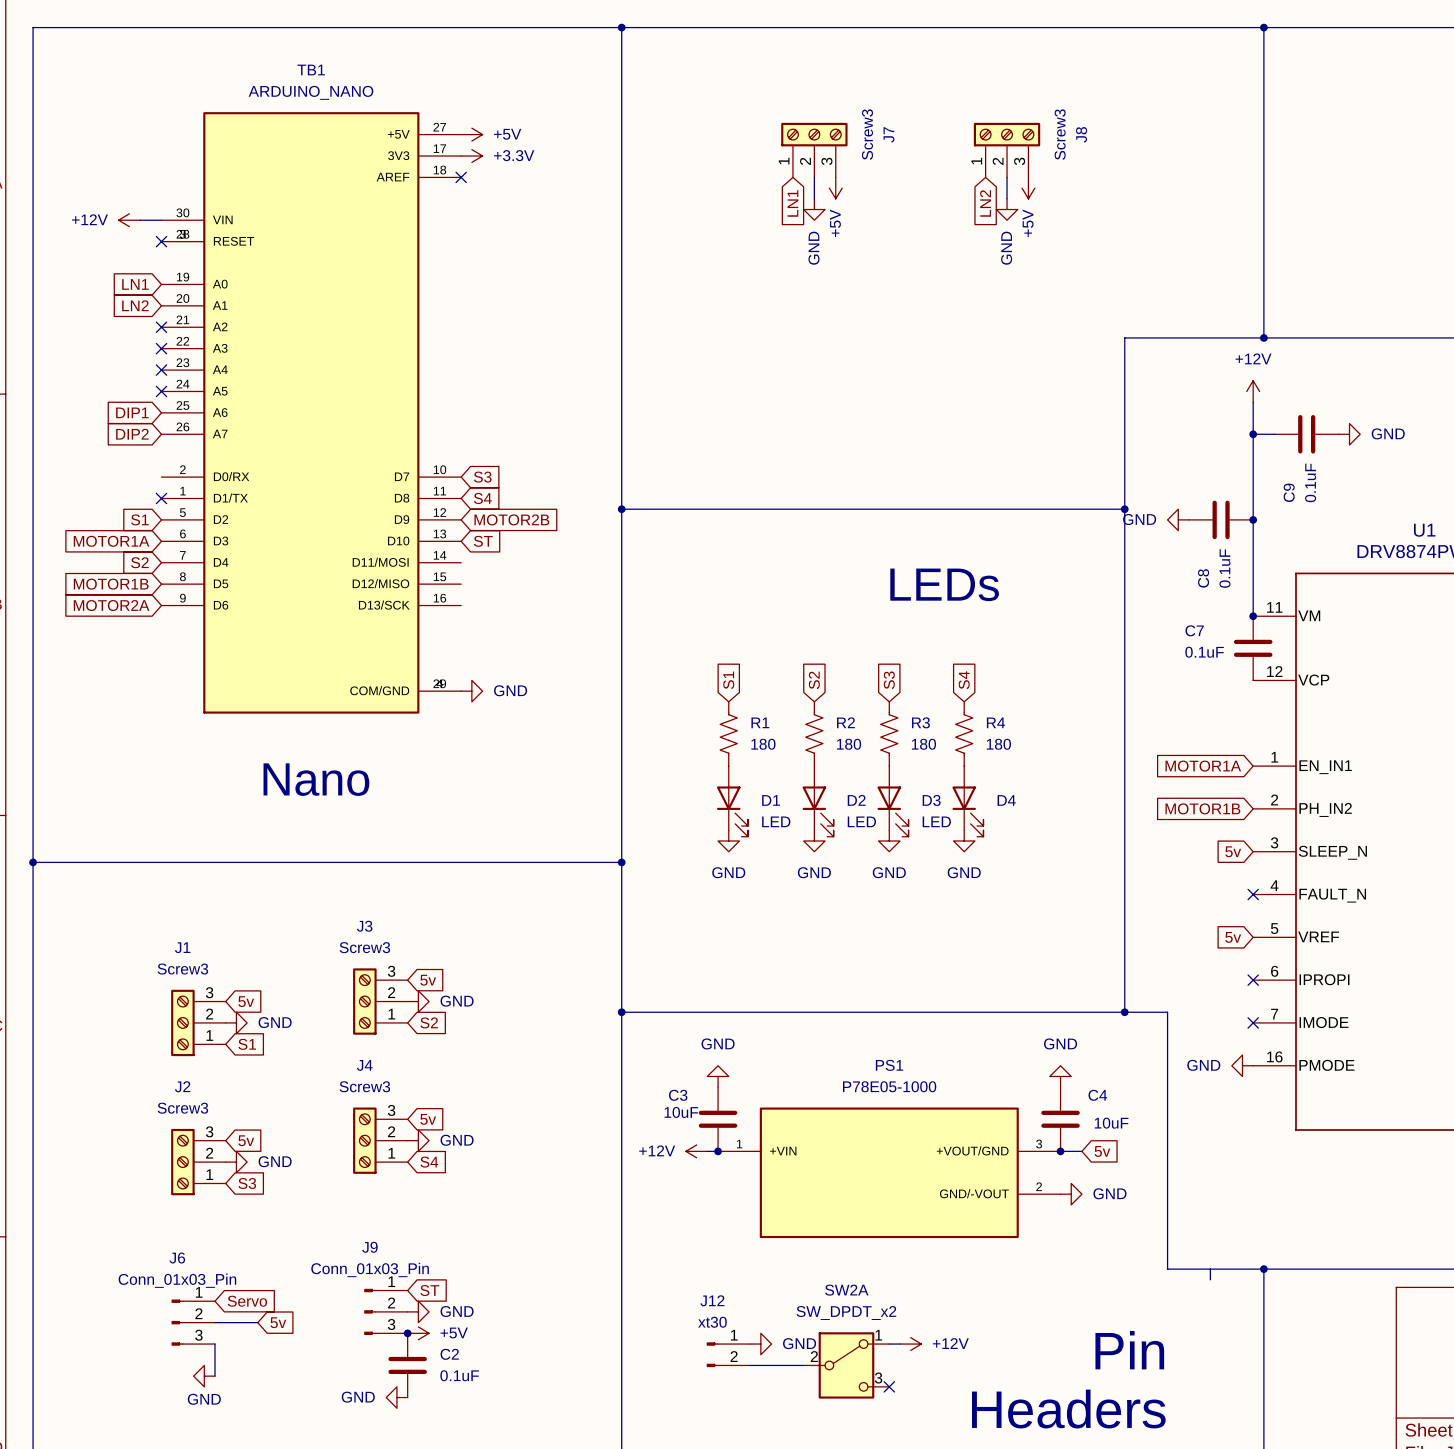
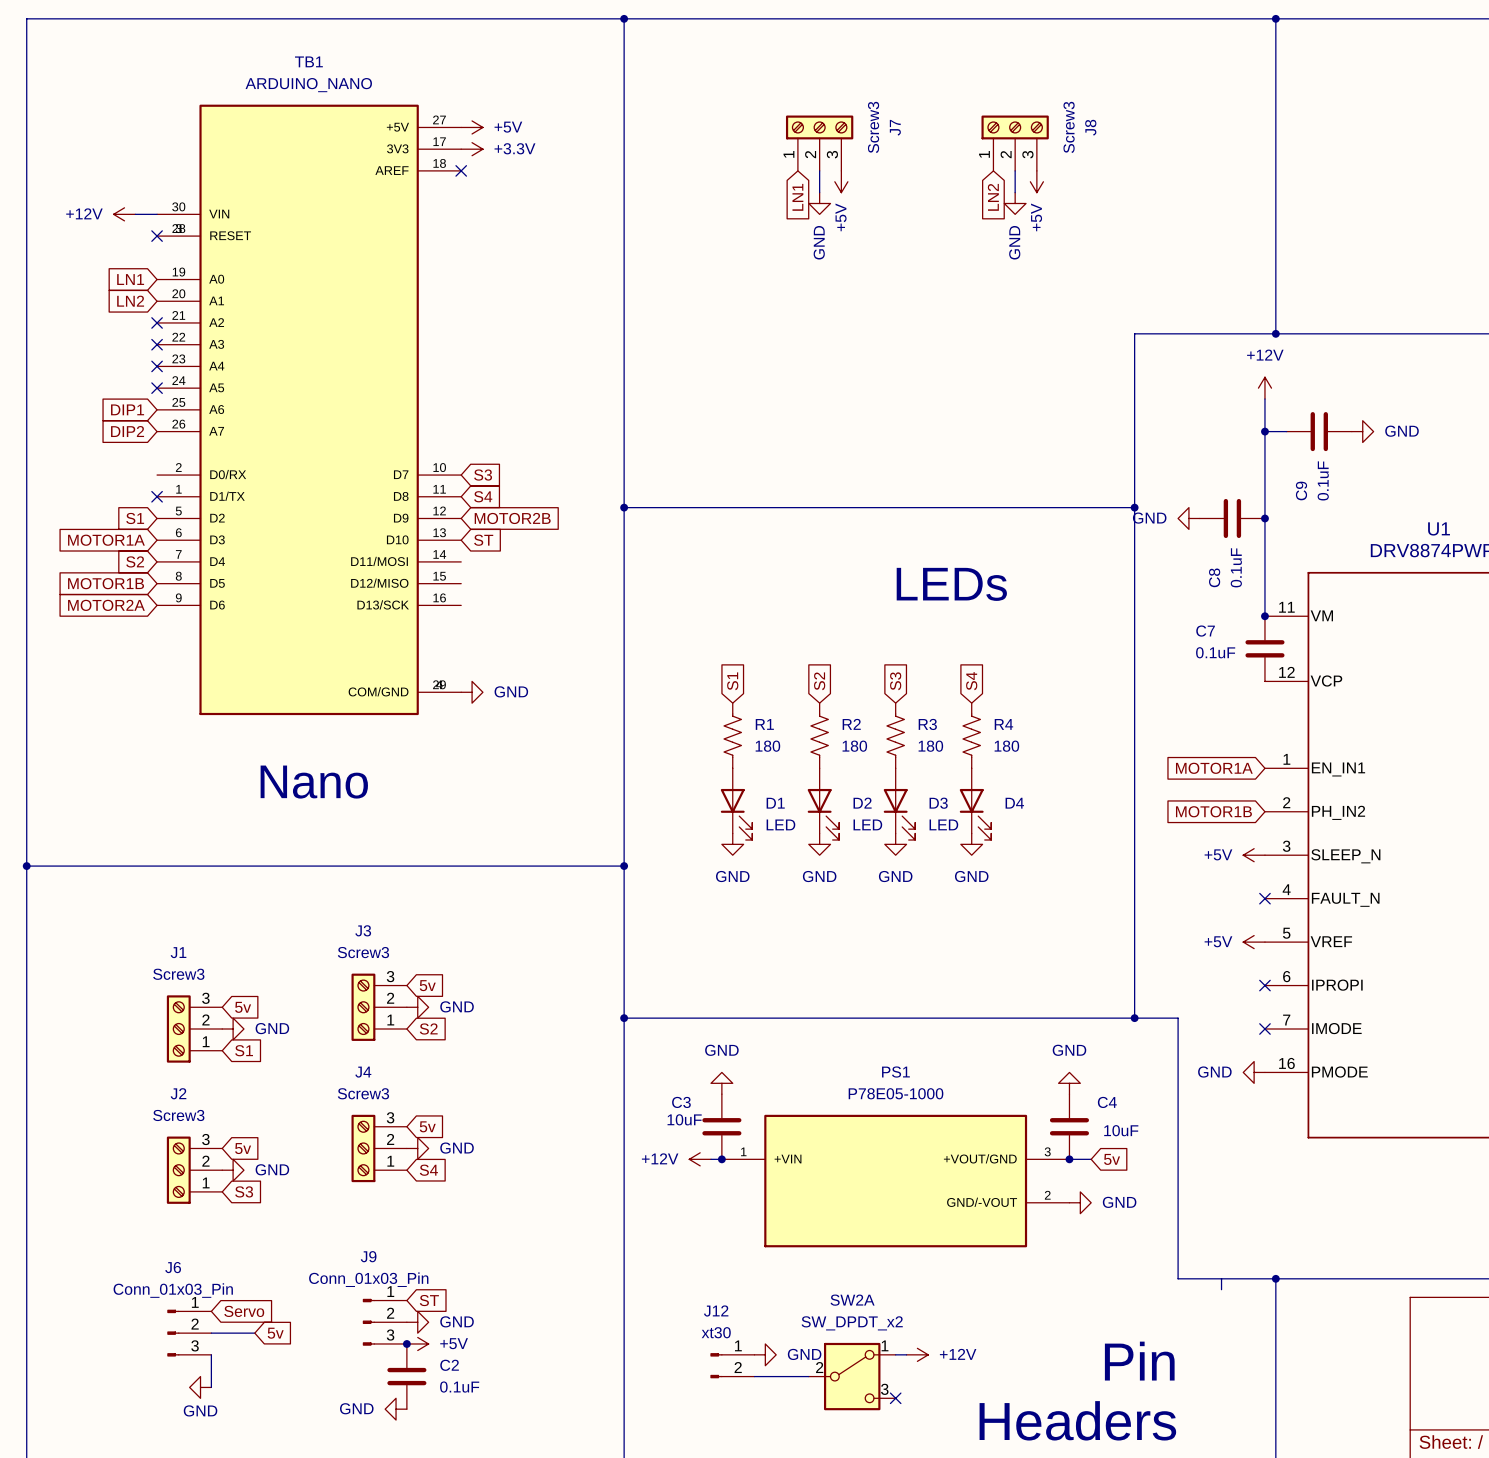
global label: 5v (1233, 851) -> none
power symbol: none -> +5V (1254, 855)
global label: 5v (1233, 937) -> none
power symbol: none -> +5V (1254, 942)

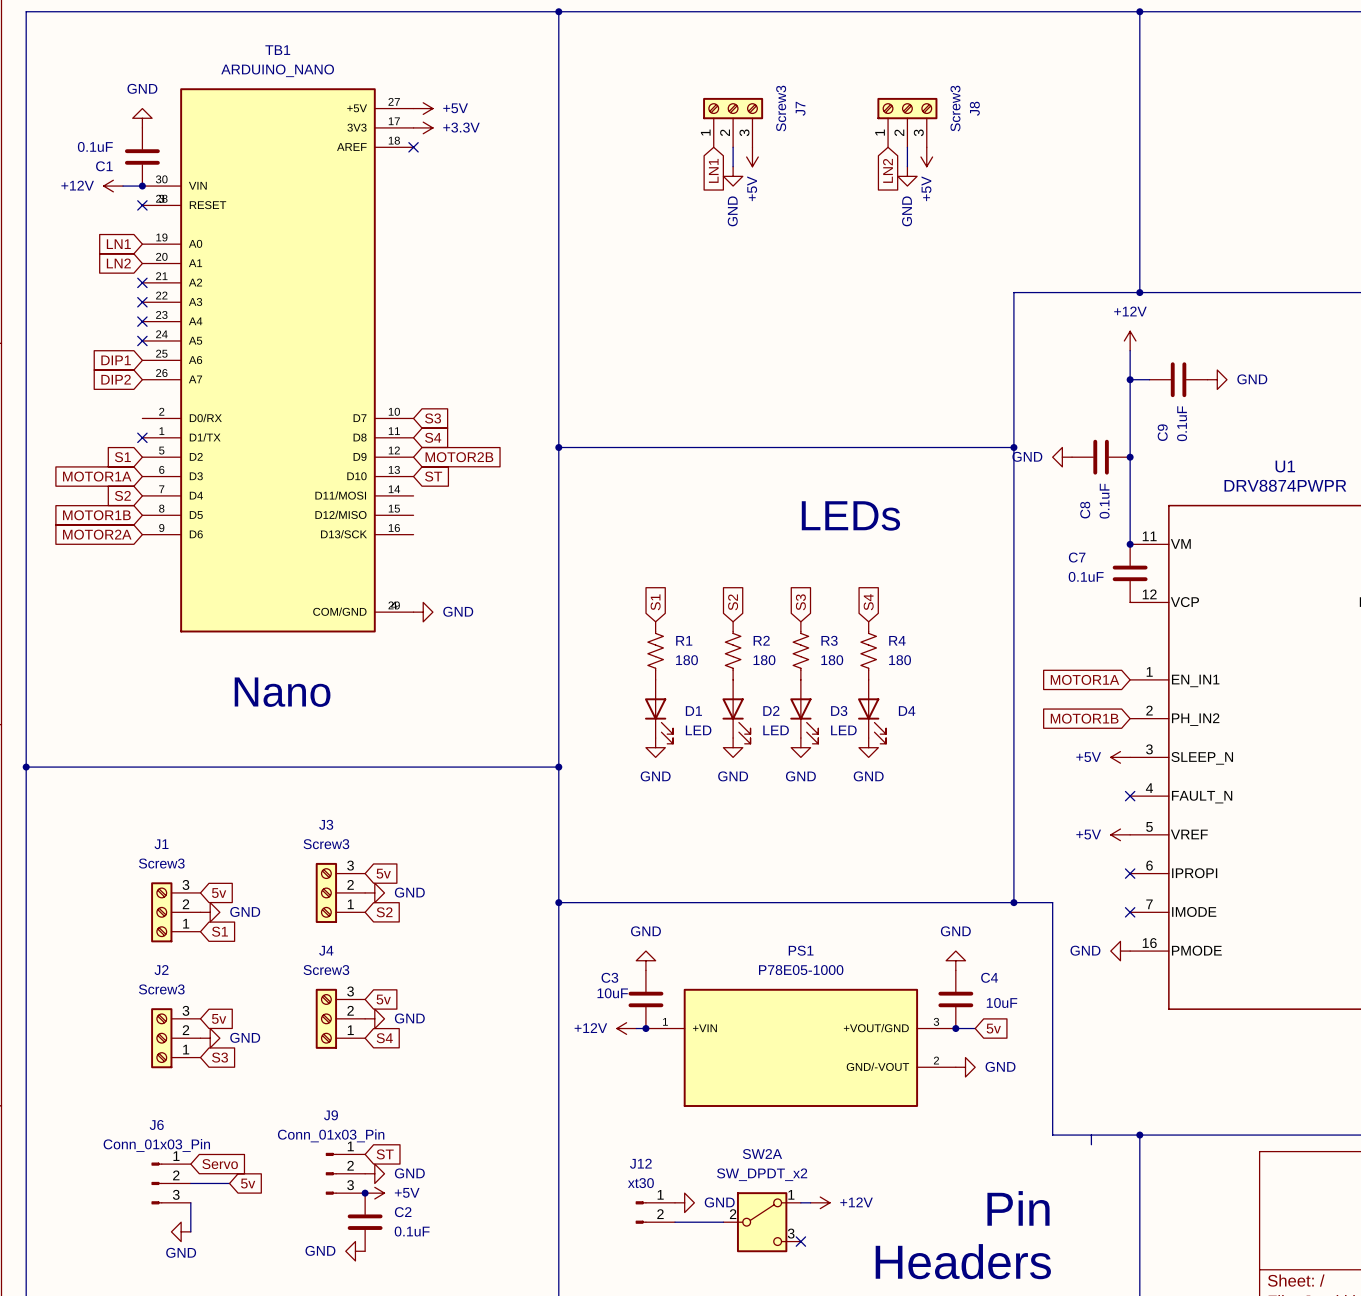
power symbol: none -> GND (142, 118)
C1: none -> 0.1uF (142, 156)
junction: none -> (142, 186)

